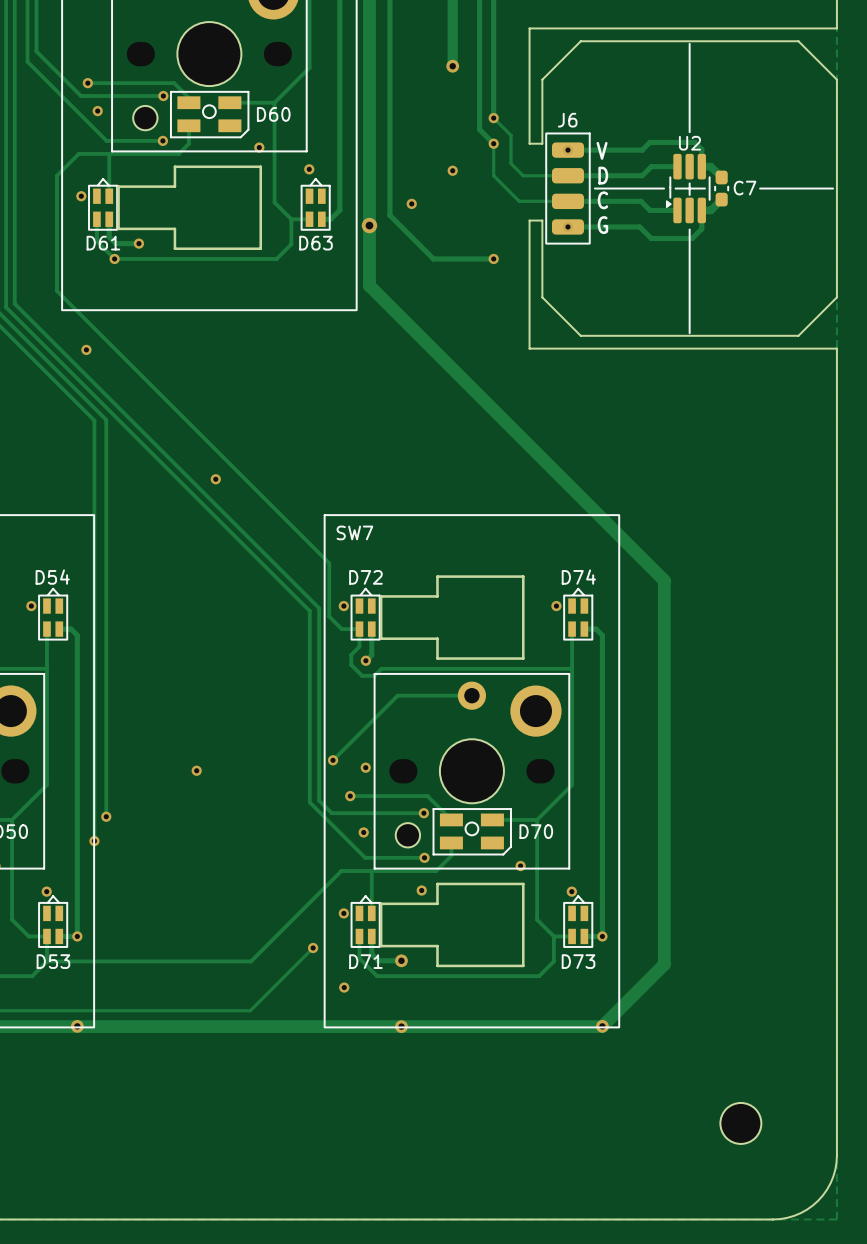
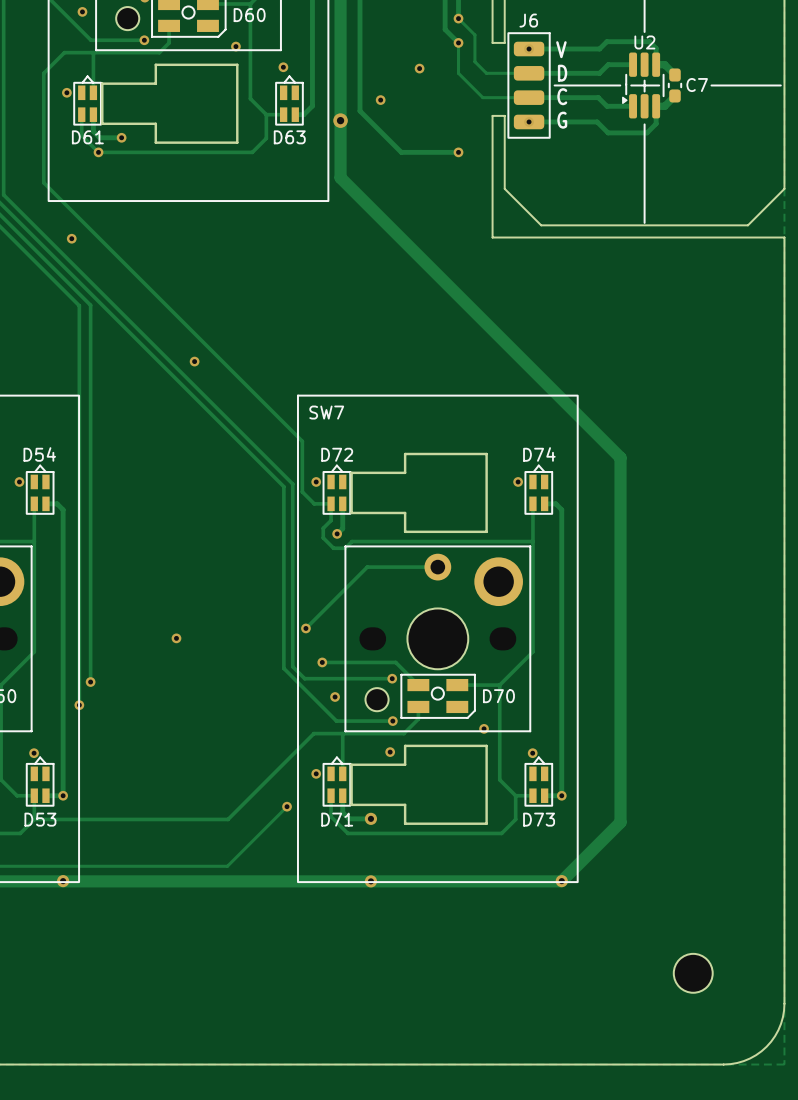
via: (365, 767) -> none
via: (344, 987) -> none

